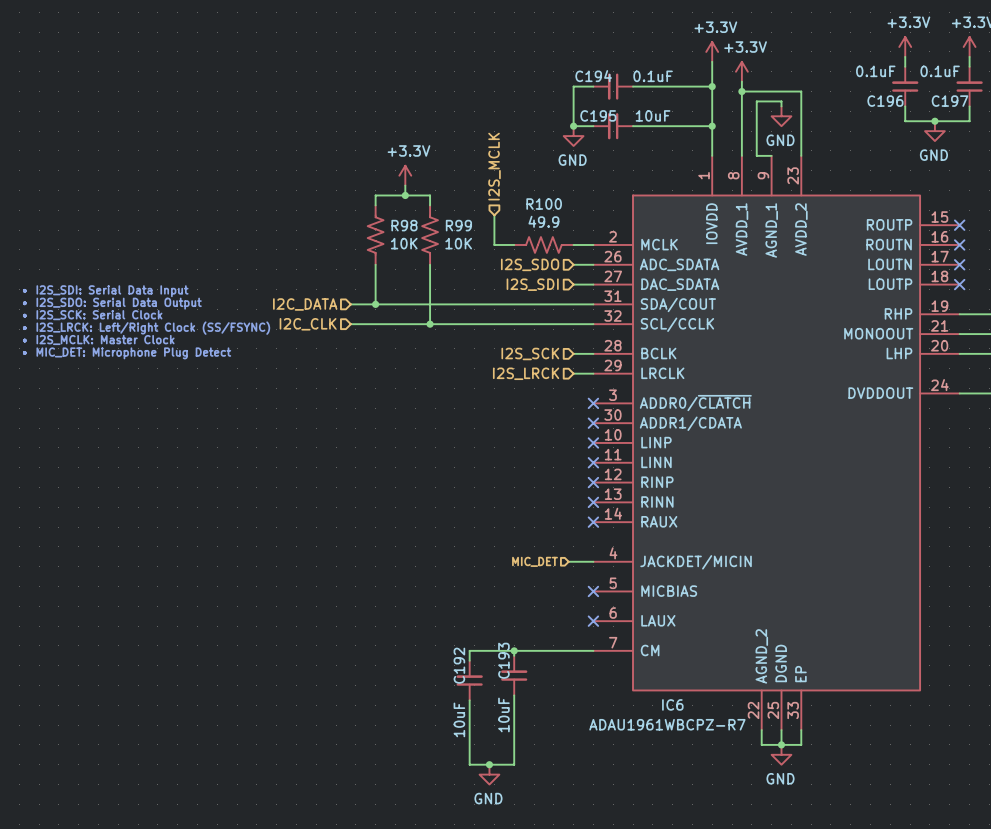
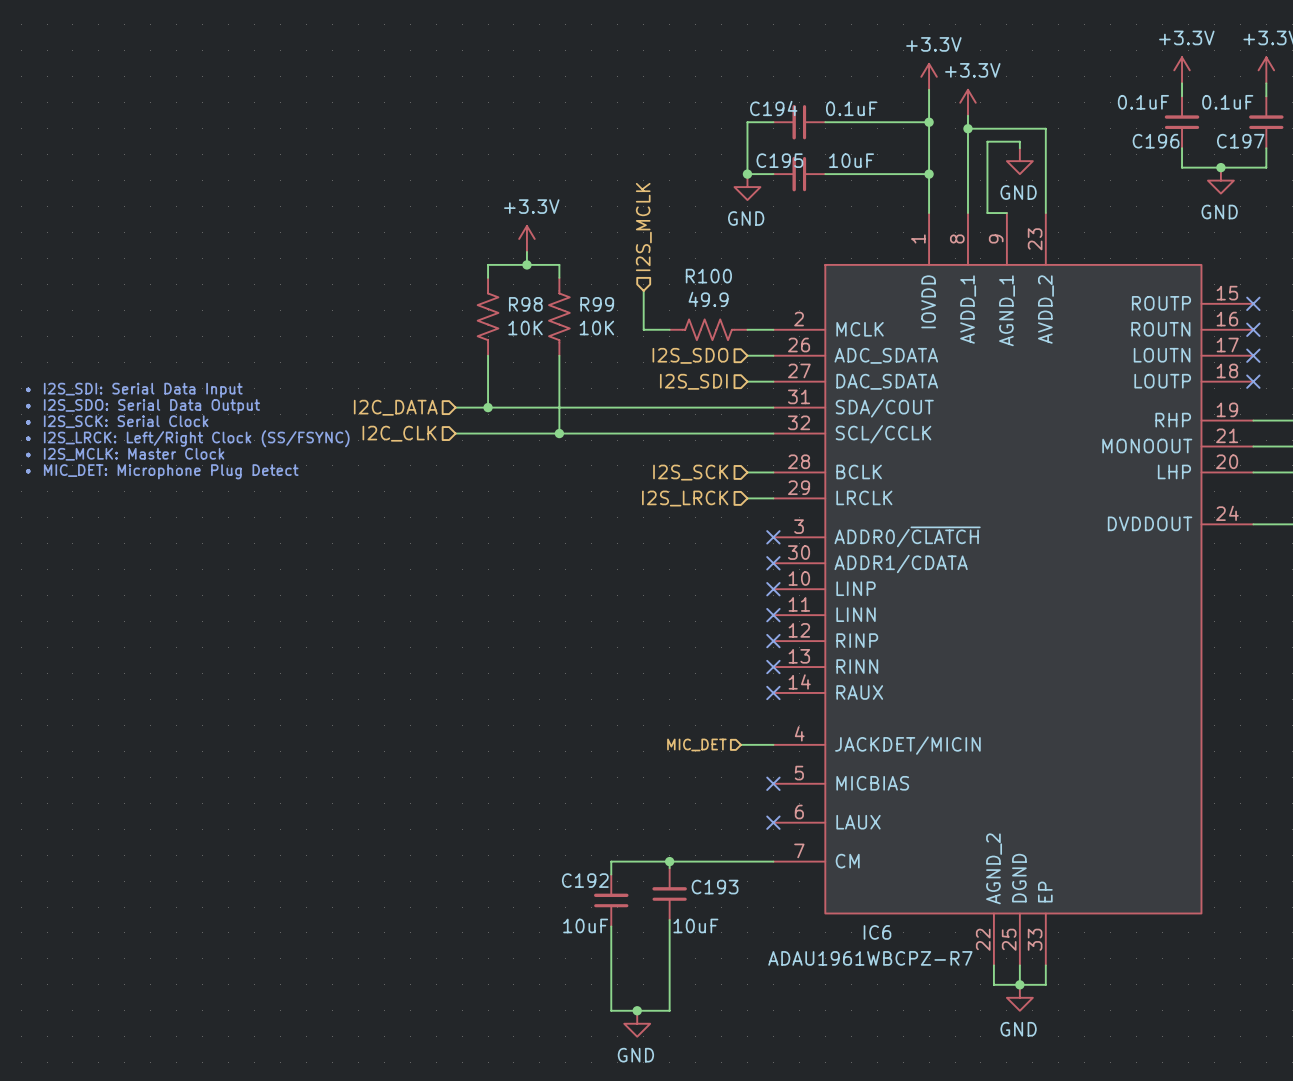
C193 name rotation: 0° (503, 660) -> 90° clockwise (715, 887)
C193 name position: C193 (503, 660) -> C193 (715, 887)
C192 name rotation: 0° (459, 665) -> 90° clockwise (585, 880)
C193 value rotation: 0° (503, 714) -> 90° clockwise (695, 925)
C192 value rotation: 0° (459, 719) -> 90° clockwise (585, 925)

